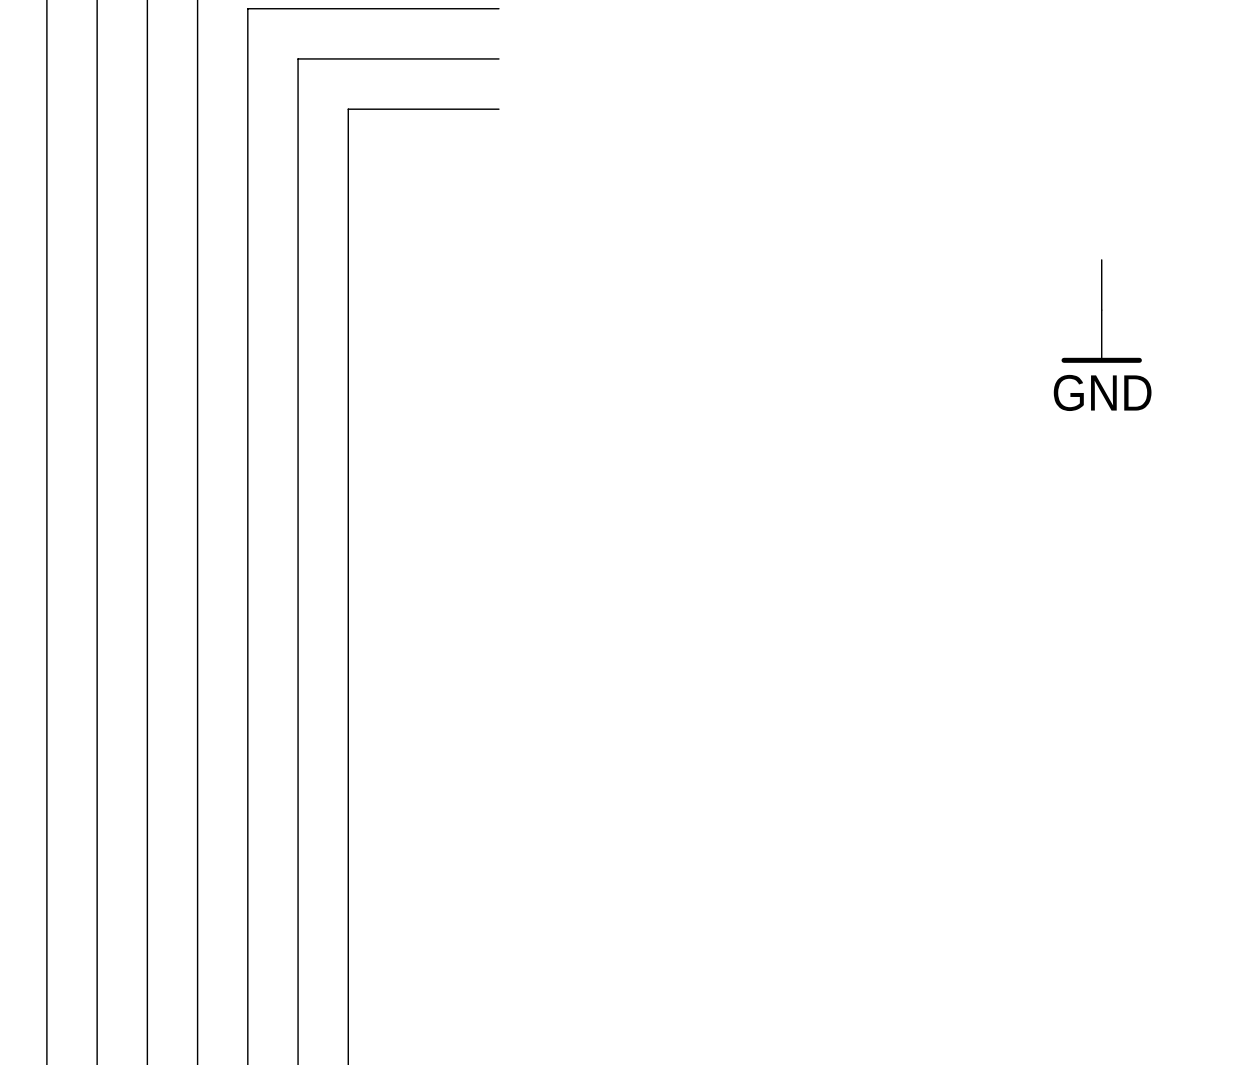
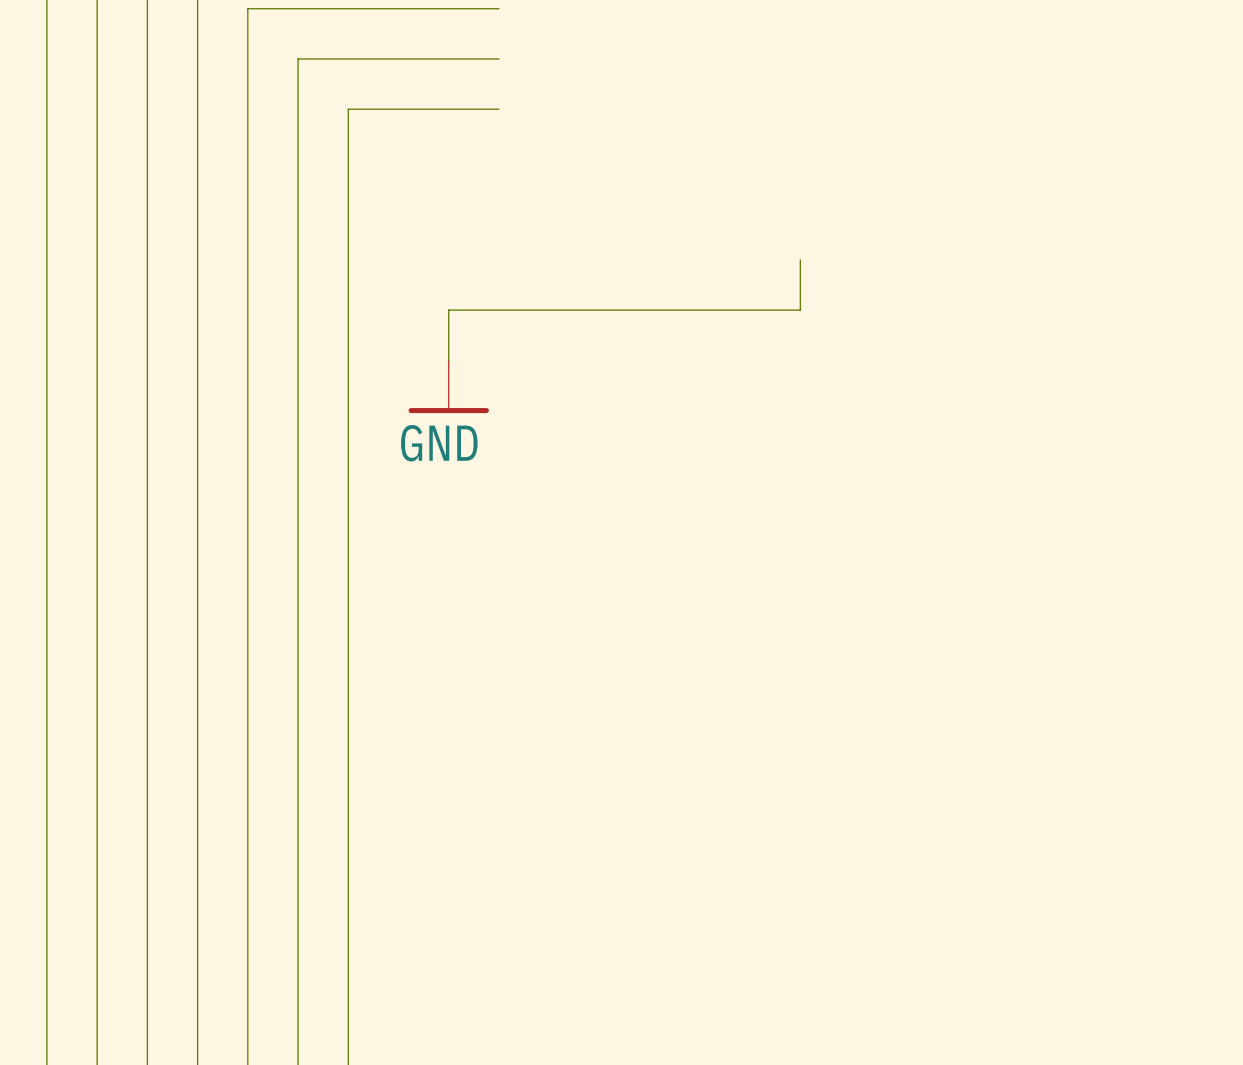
wire: none -> (800, 259) (800, 310) (448, 310) (448, 360)
wire: (1101, 259) (1101, 310) -> none
power symbol: GND (1101, 336) -> none
power symbol: none -> GND (448, 386)

